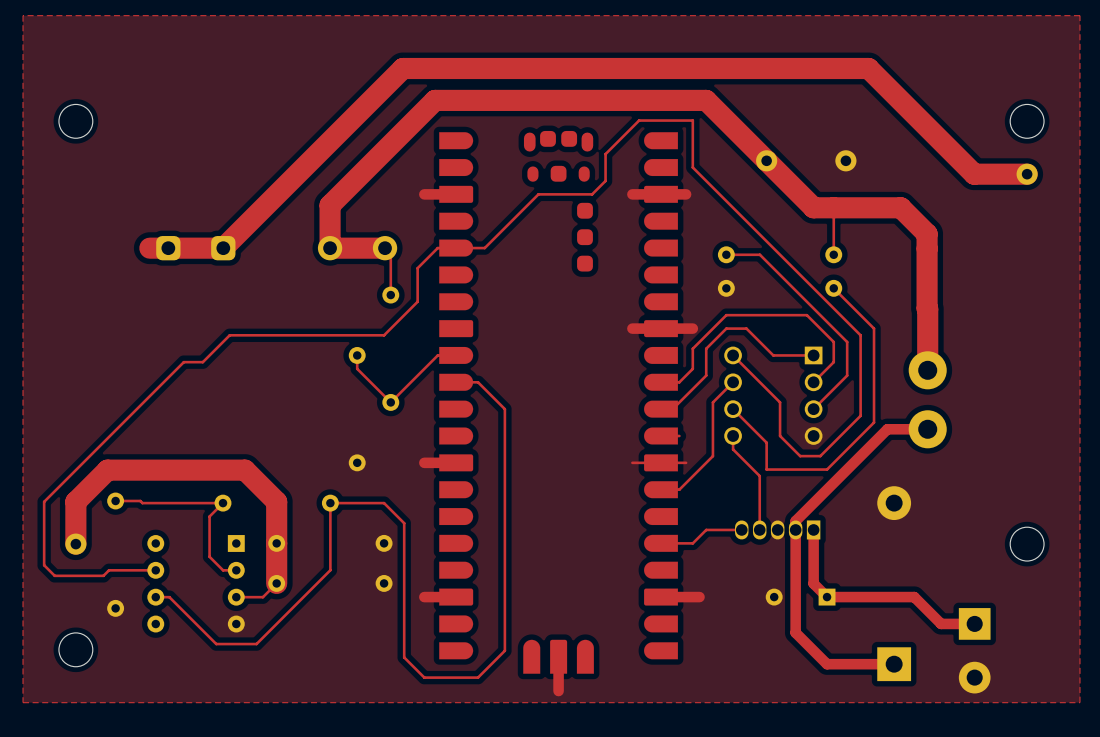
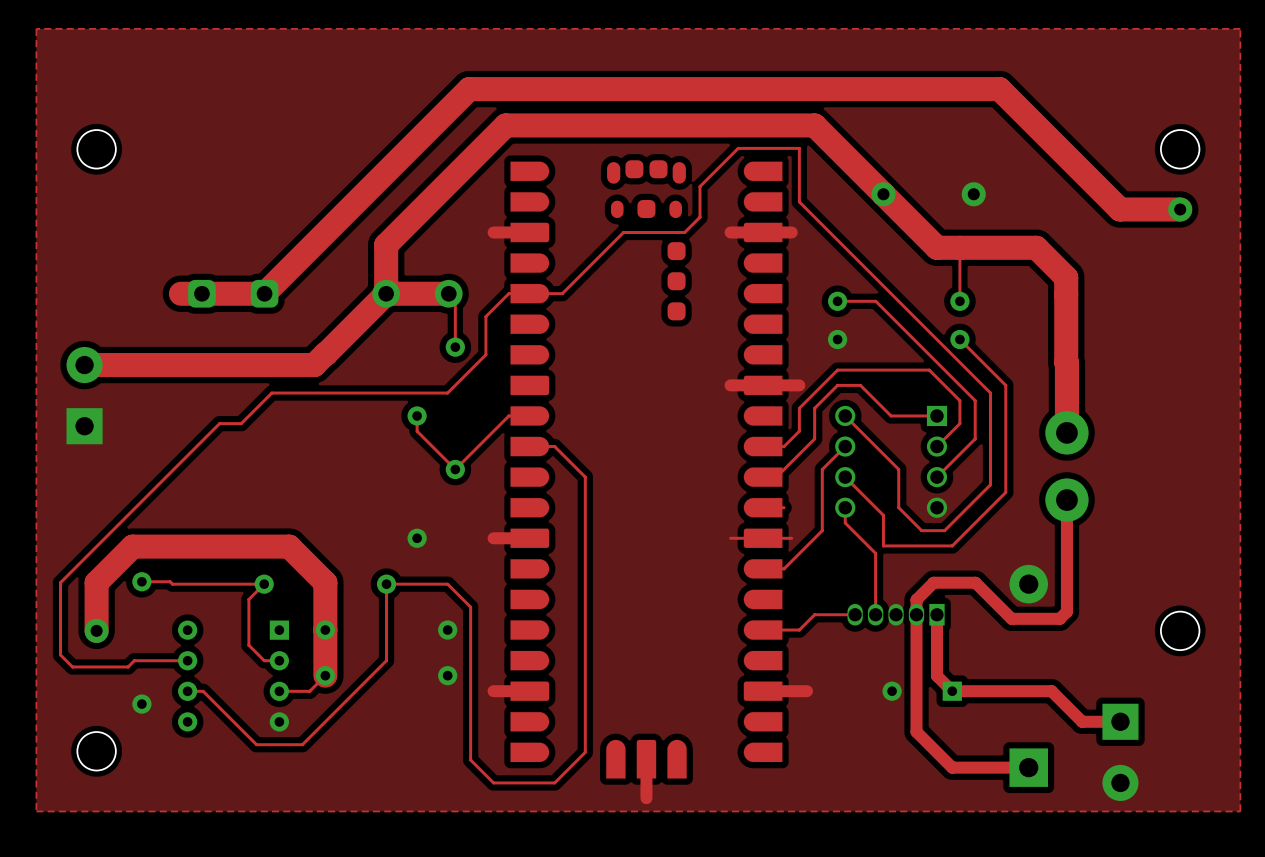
top track: none -> (386, 293) (314, 365) (84, 365)
part: none -> (84, 395)
top track: (927, 429) (887, 429) (795, 521) -> (1066, 500) (1066, 611) (1059, 618) (1011, 618) (975, 582) (933, 582) (916, 599) (916, 604)

